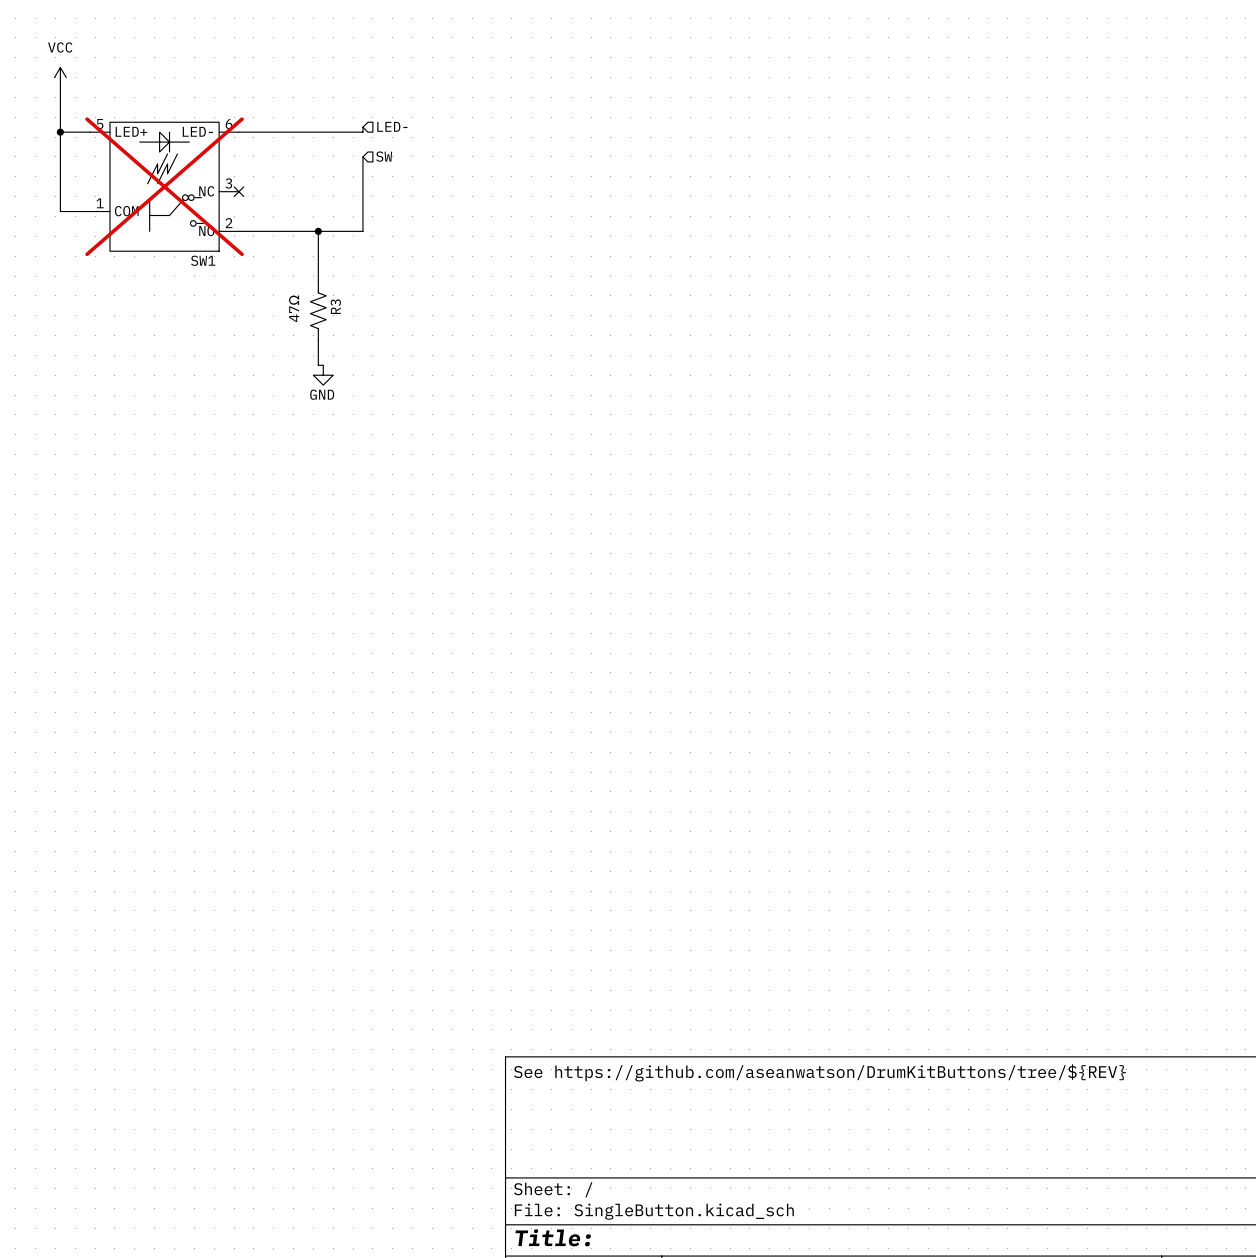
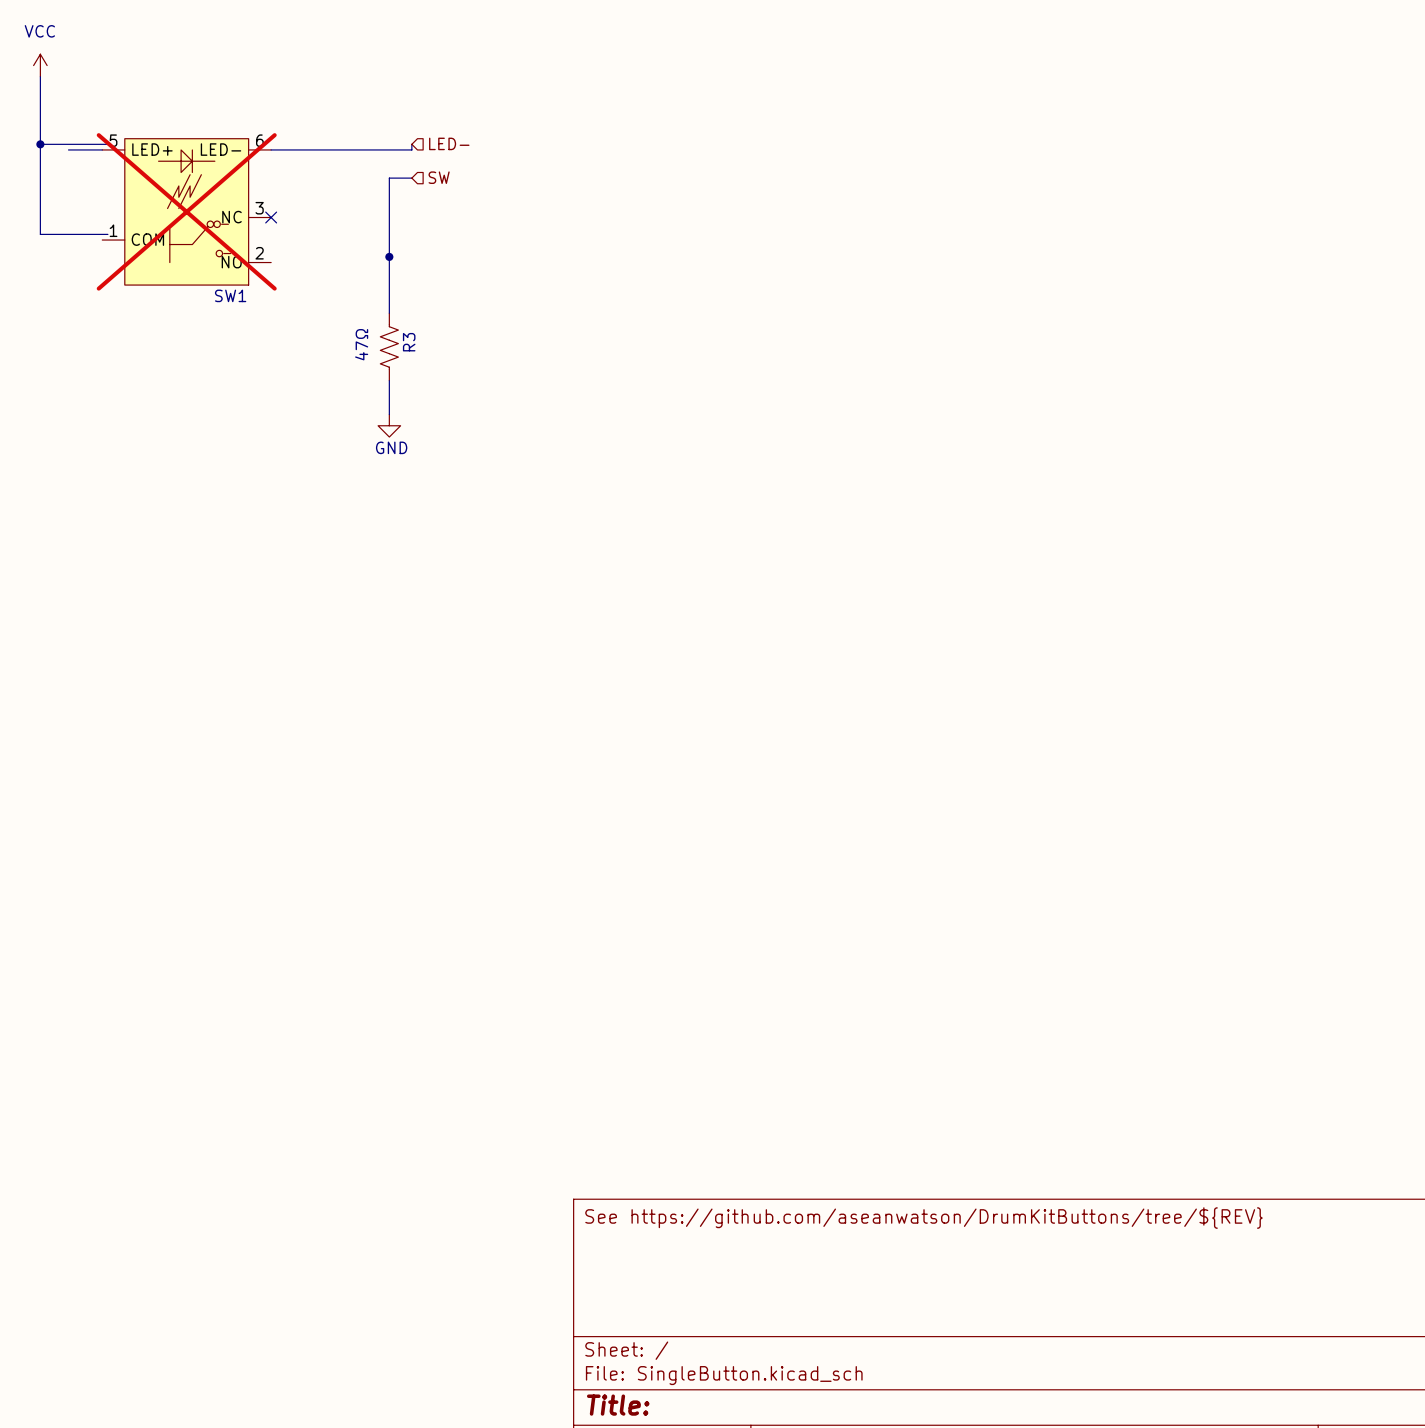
wire: none -> (40, 76) (40, 234) (107, 234)
power symbol position: VCC (60, 77) -> VCC (40, 65)
wire: (60, 87) (60, 211) (90, 211) -> none
wire: none -> (40, 144) (107, 144)
junction position: (60, 132) -> (40, 144)
wire: (362, 156) (362, 231) (238, 231) -> (411, 178) (389, 178) (389, 313)
wire: (318, 231) (318, 280) -> none
junction position: (318, 231) -> (389, 256)
R3 position: (318, 310) -> (389, 346)
wire: none -> (389, 380) (389, 414)
wire: (318, 340) (318, 365) (323, 365) -> none
power symbol position: GND (323, 375) -> GND (389, 425)

